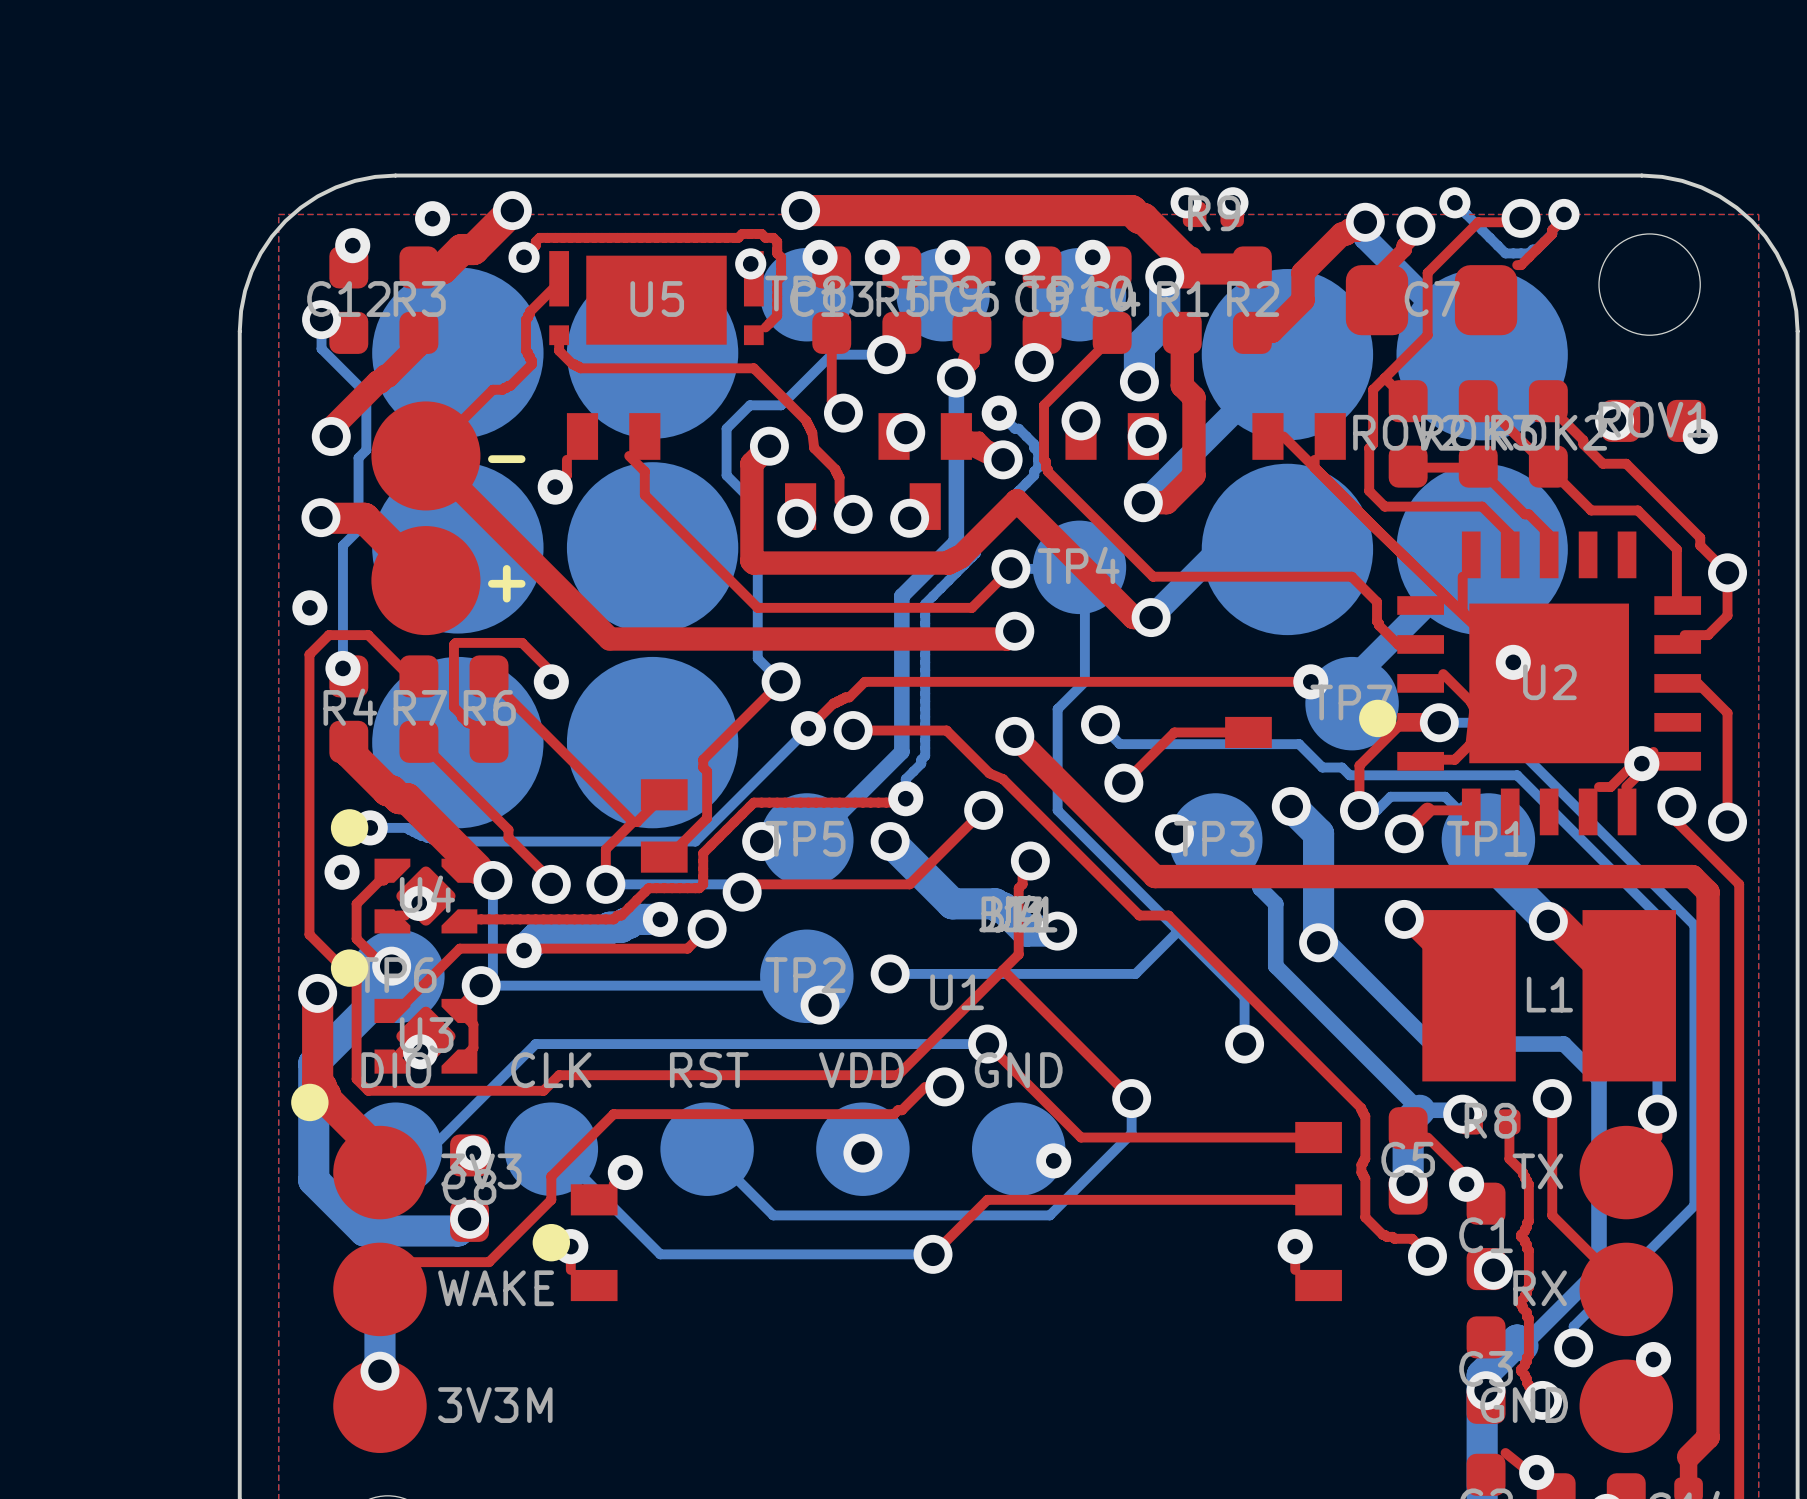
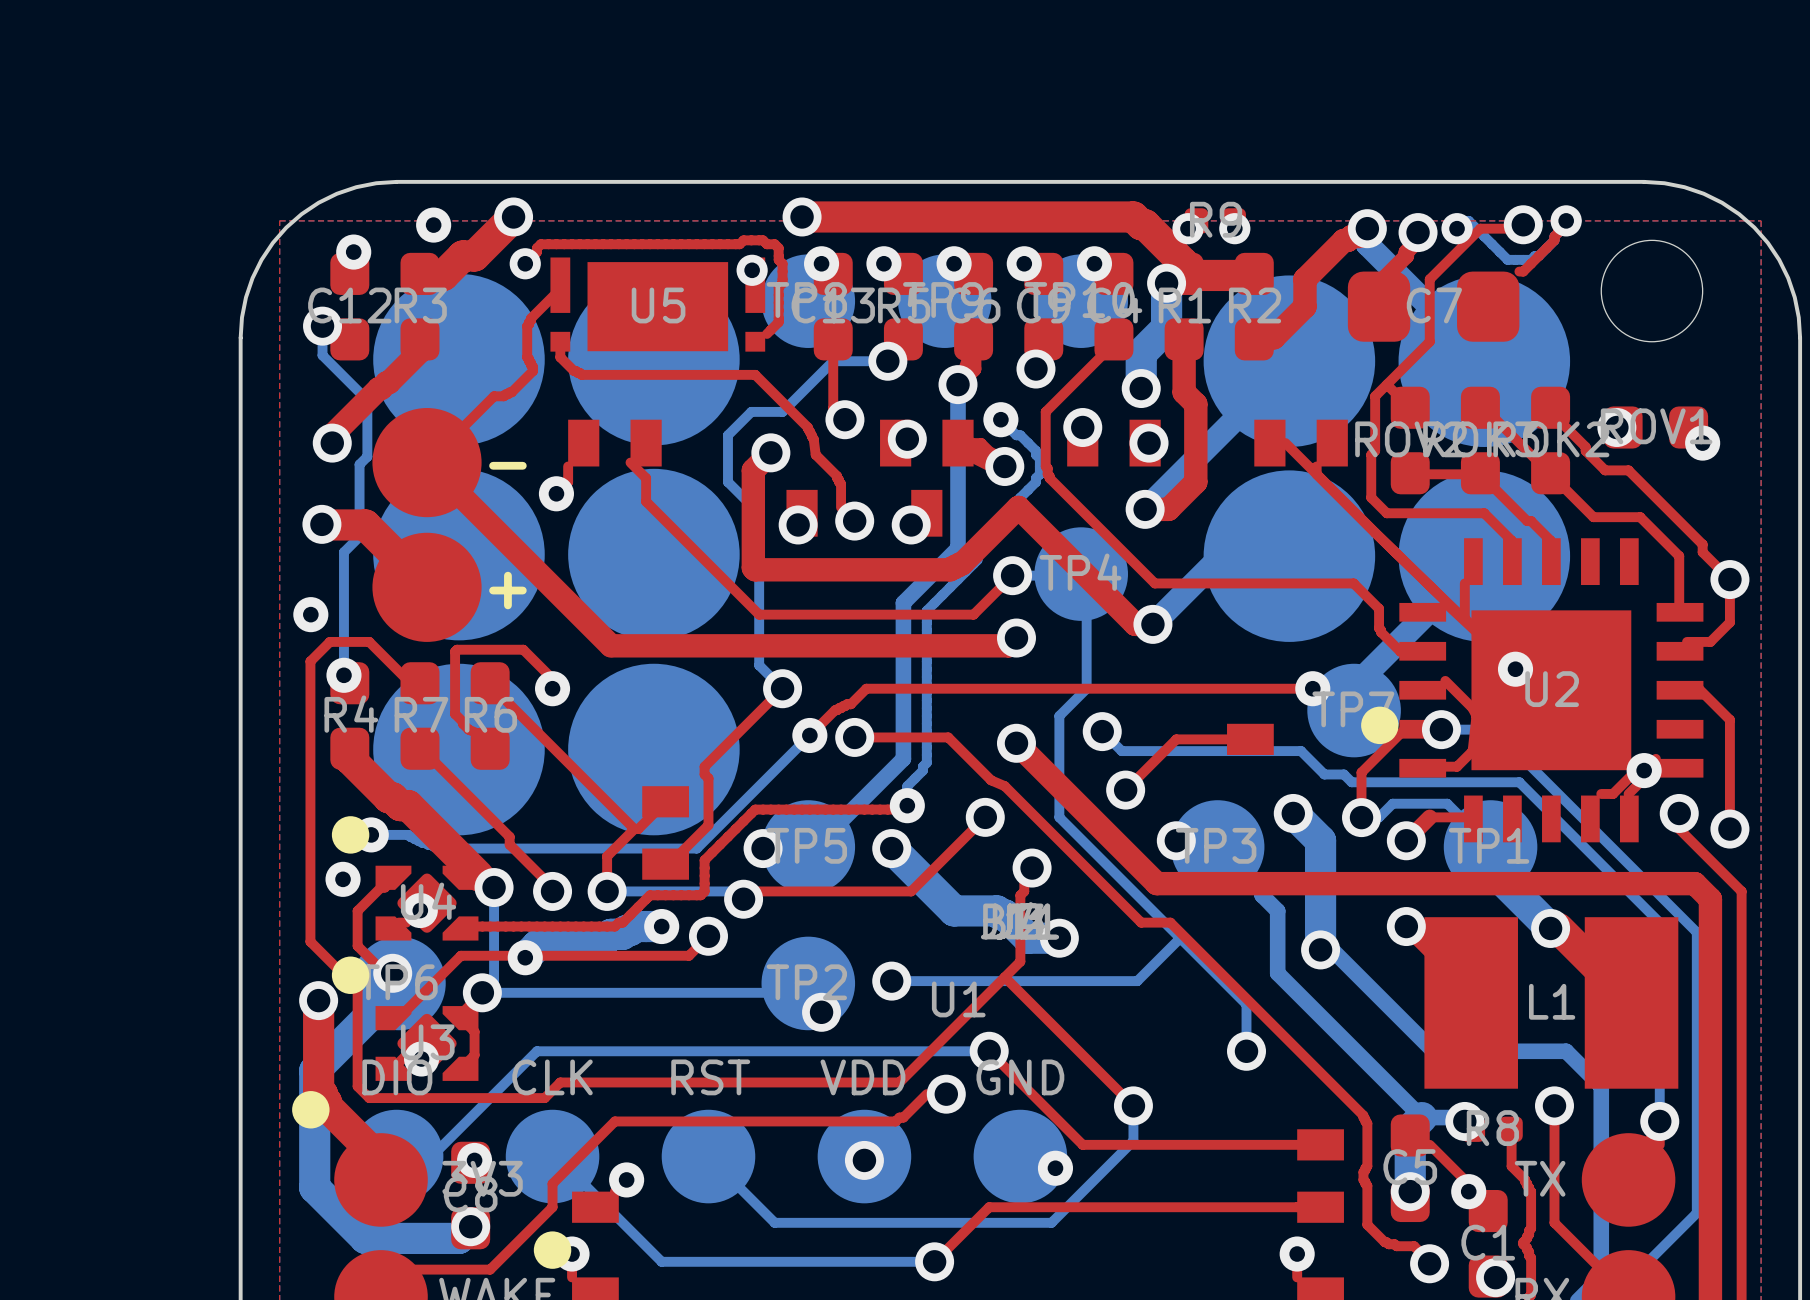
via position: (1186, 202) -> (1188, 228)
via position: (1232, 202) -> (1234, 228)
via position: (1454, 202) -> (1457, 228)

